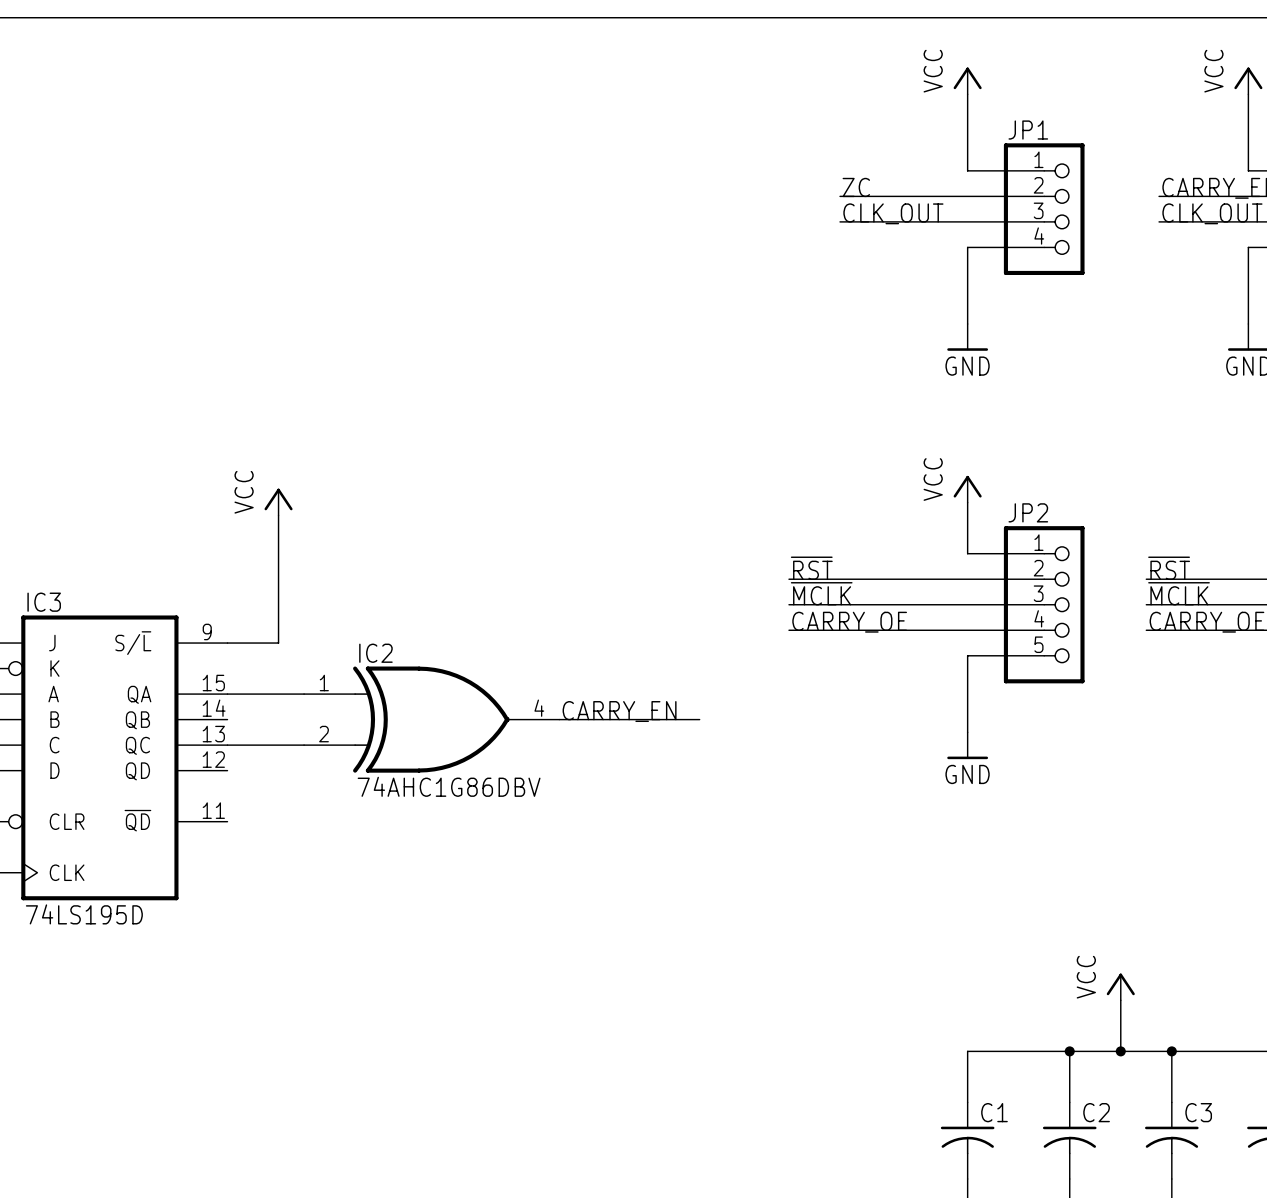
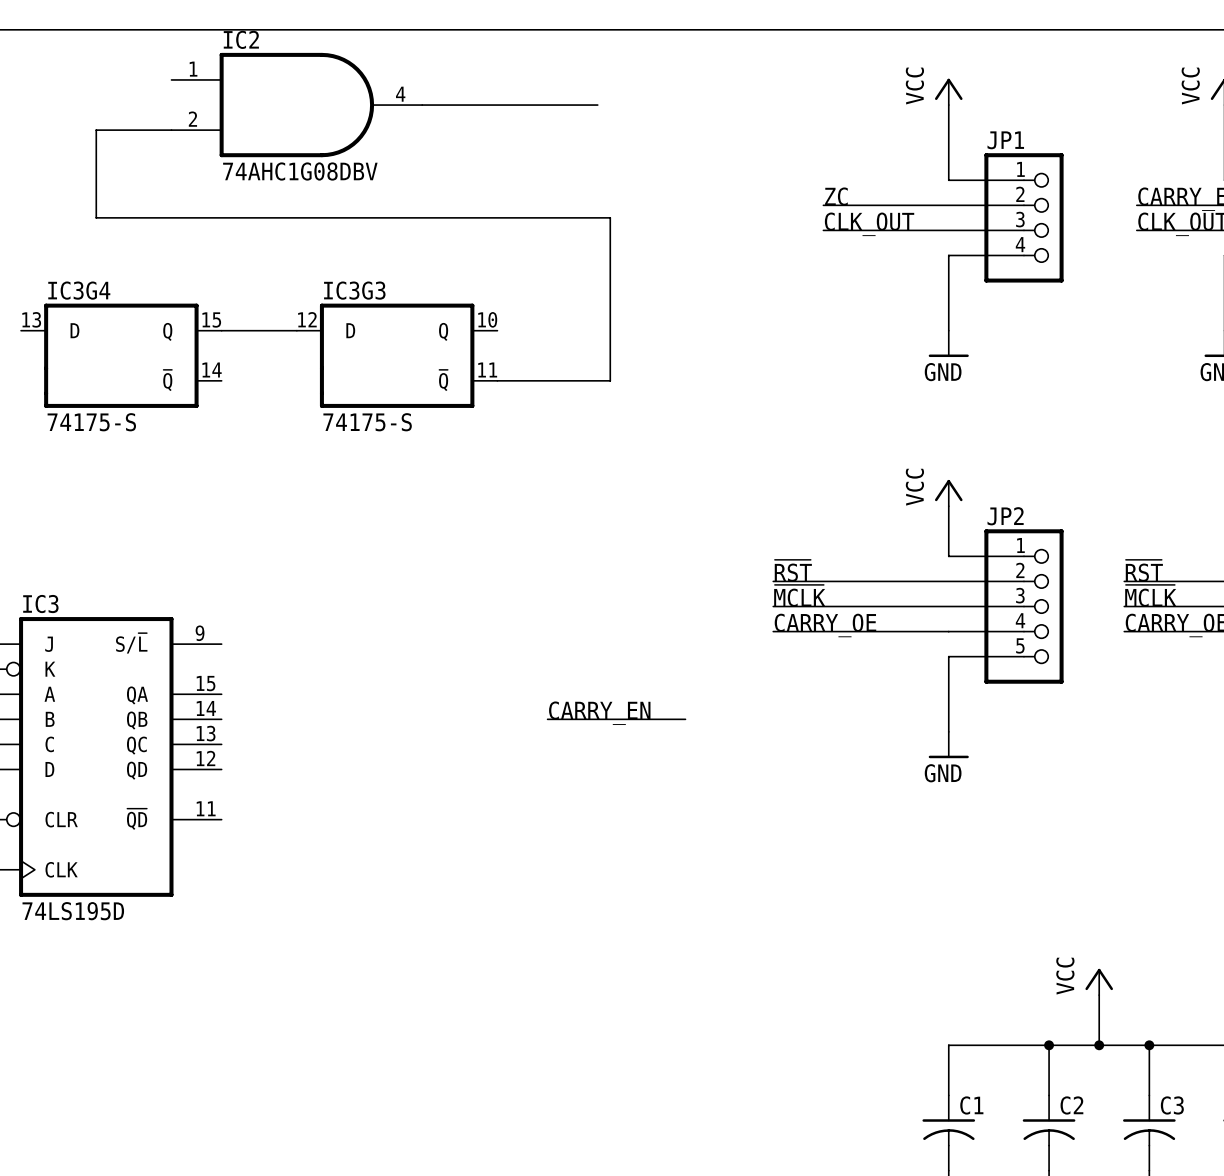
wire: none -> (422, 105) (597, 105)
wire: none -> (171, 130) (96, 130) (96, 217) (610, 217) (610, 380) (497, 380)
wire: none -> (221, 330) (296, 330)
IC3G4: none -> 74175-S (121, 355)
IC3G3: none -> 74175-S (397, 355)
power symbol: VCC (278, 502) -> none
wire: (278, 515) (278, 643) (227, 643) -> none
IC2 symbol: [304, 666, 560, 773] -> [171, 52, 423, 158]
wire: (227, 694) (304, 694) -> none
wire: (227, 745) (304, 745) -> none
IC2 value: 74AHC1G86DBV (449, 786) -> 74AHC1G08DBV (300, 171)

